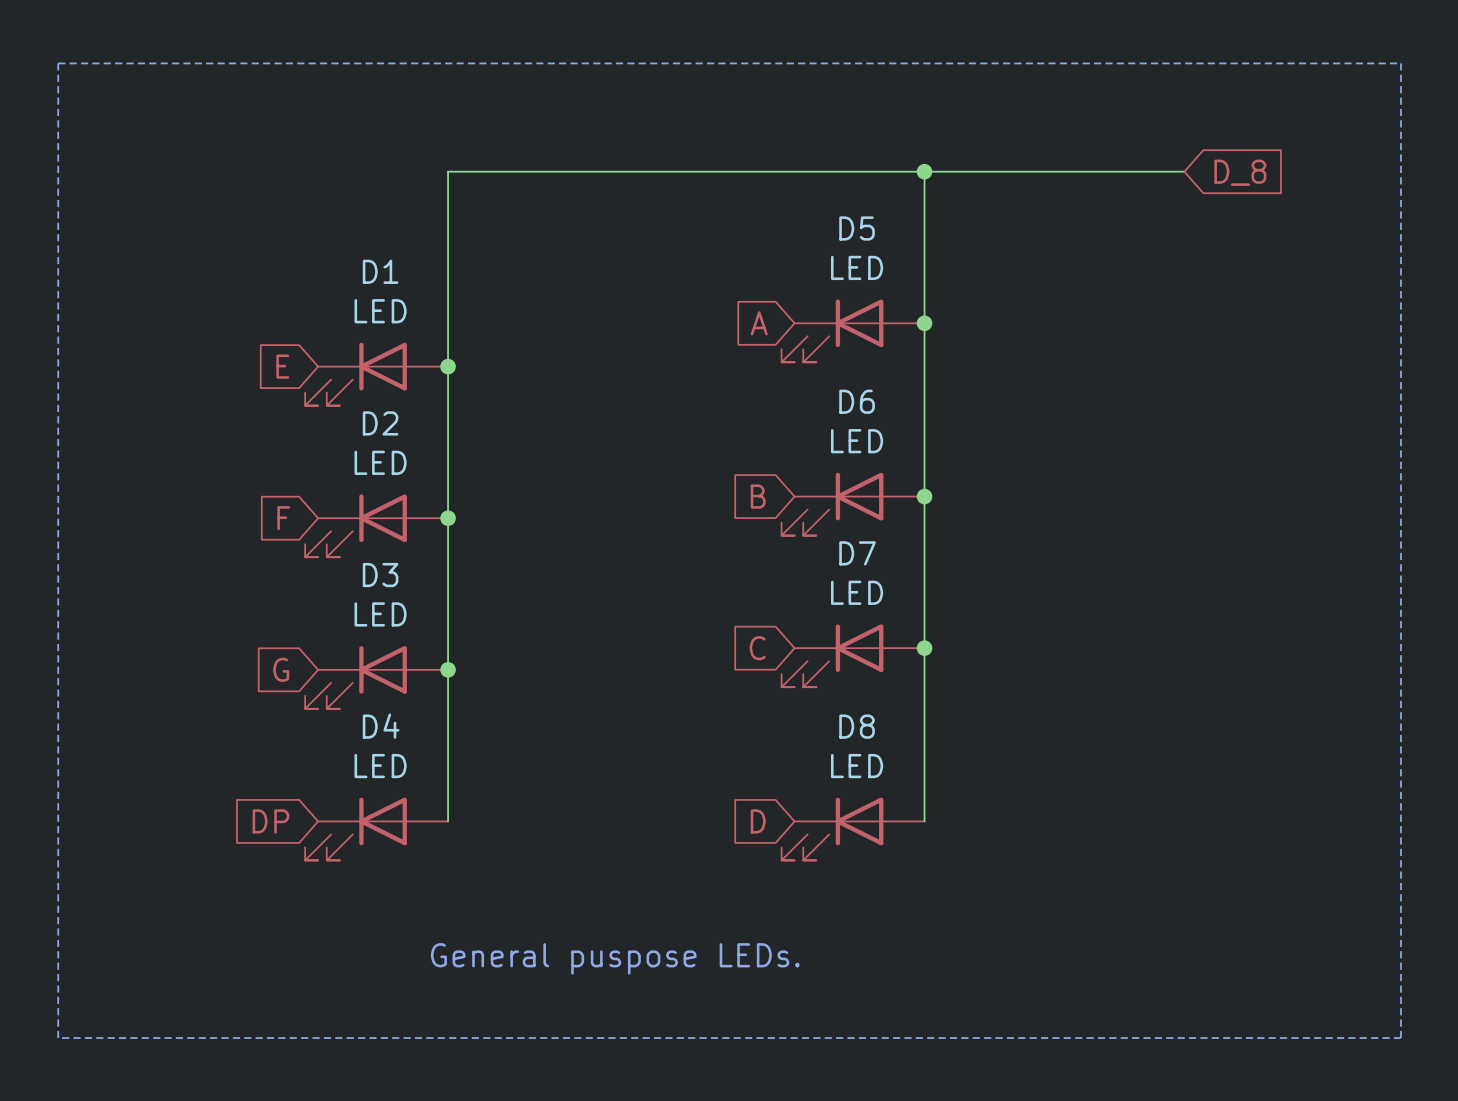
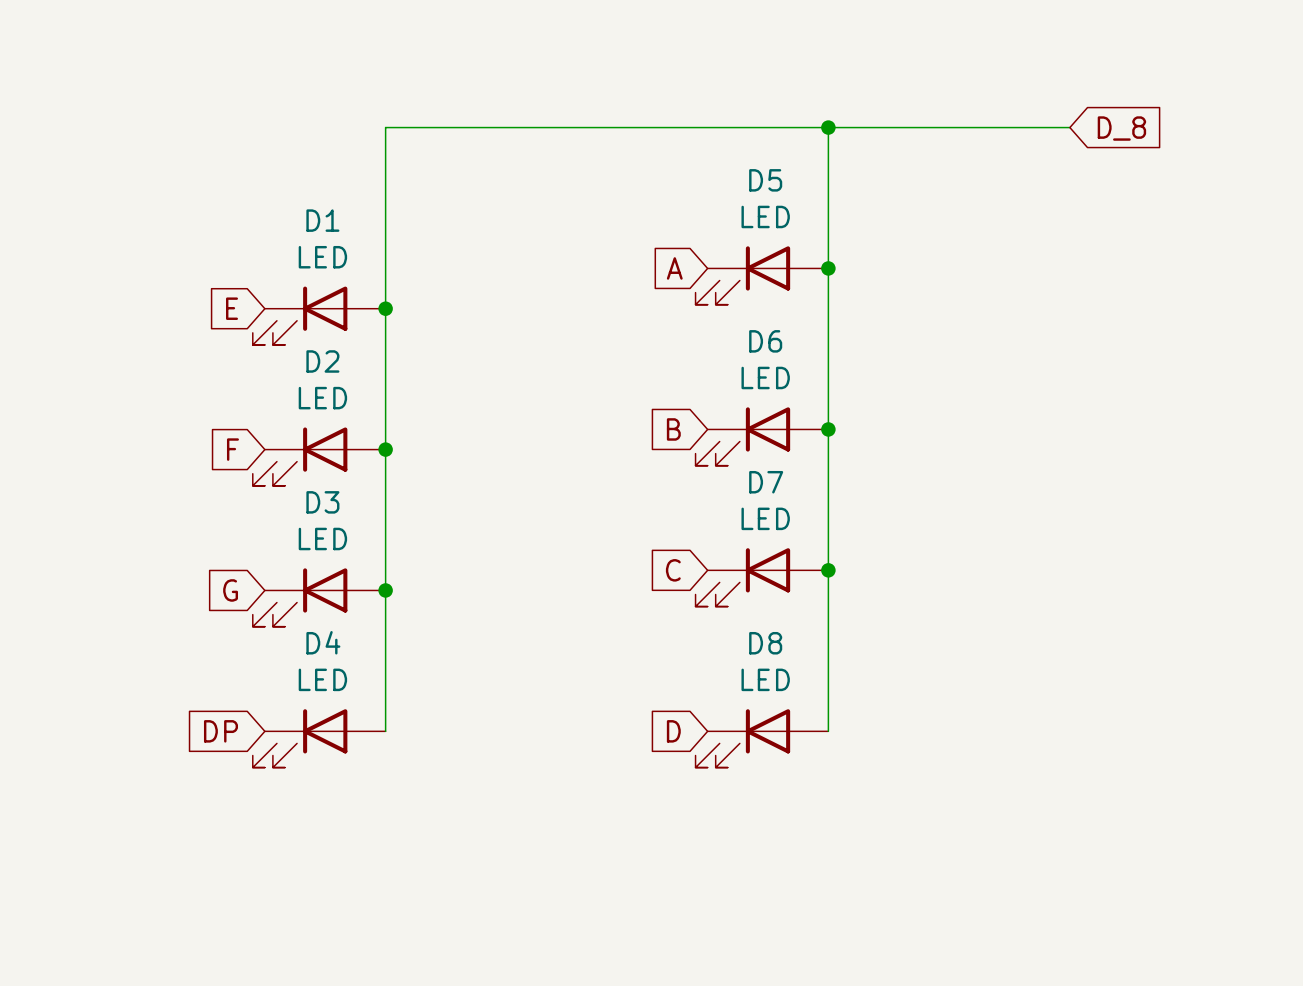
line: (58, 63) (1400, 63) (1400, 1038) (58, 1038) (58, 63) -> none
text: General puspose LEDs. (615, 958) -> none

